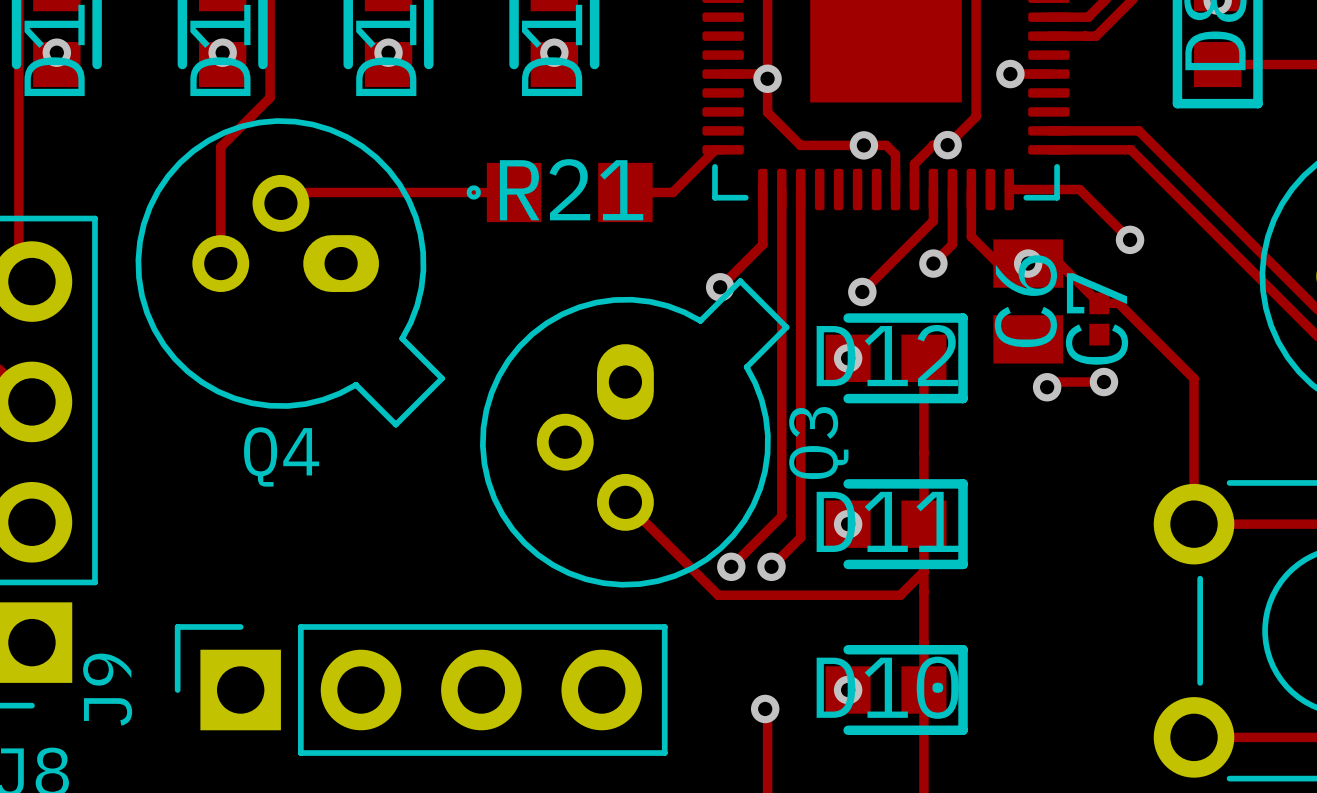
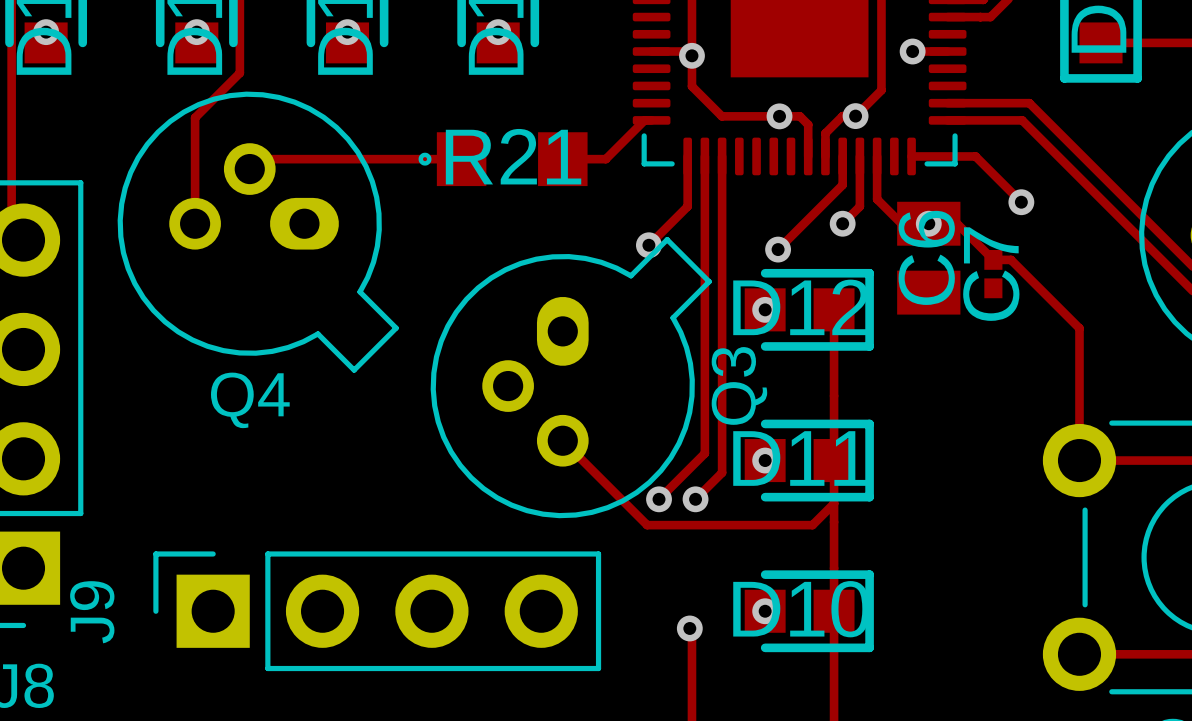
track: (1103, 382) (1052, 382) (1047, 387) -> none
via: (1103, 382) -> none
via: (1047, 387) -> none

